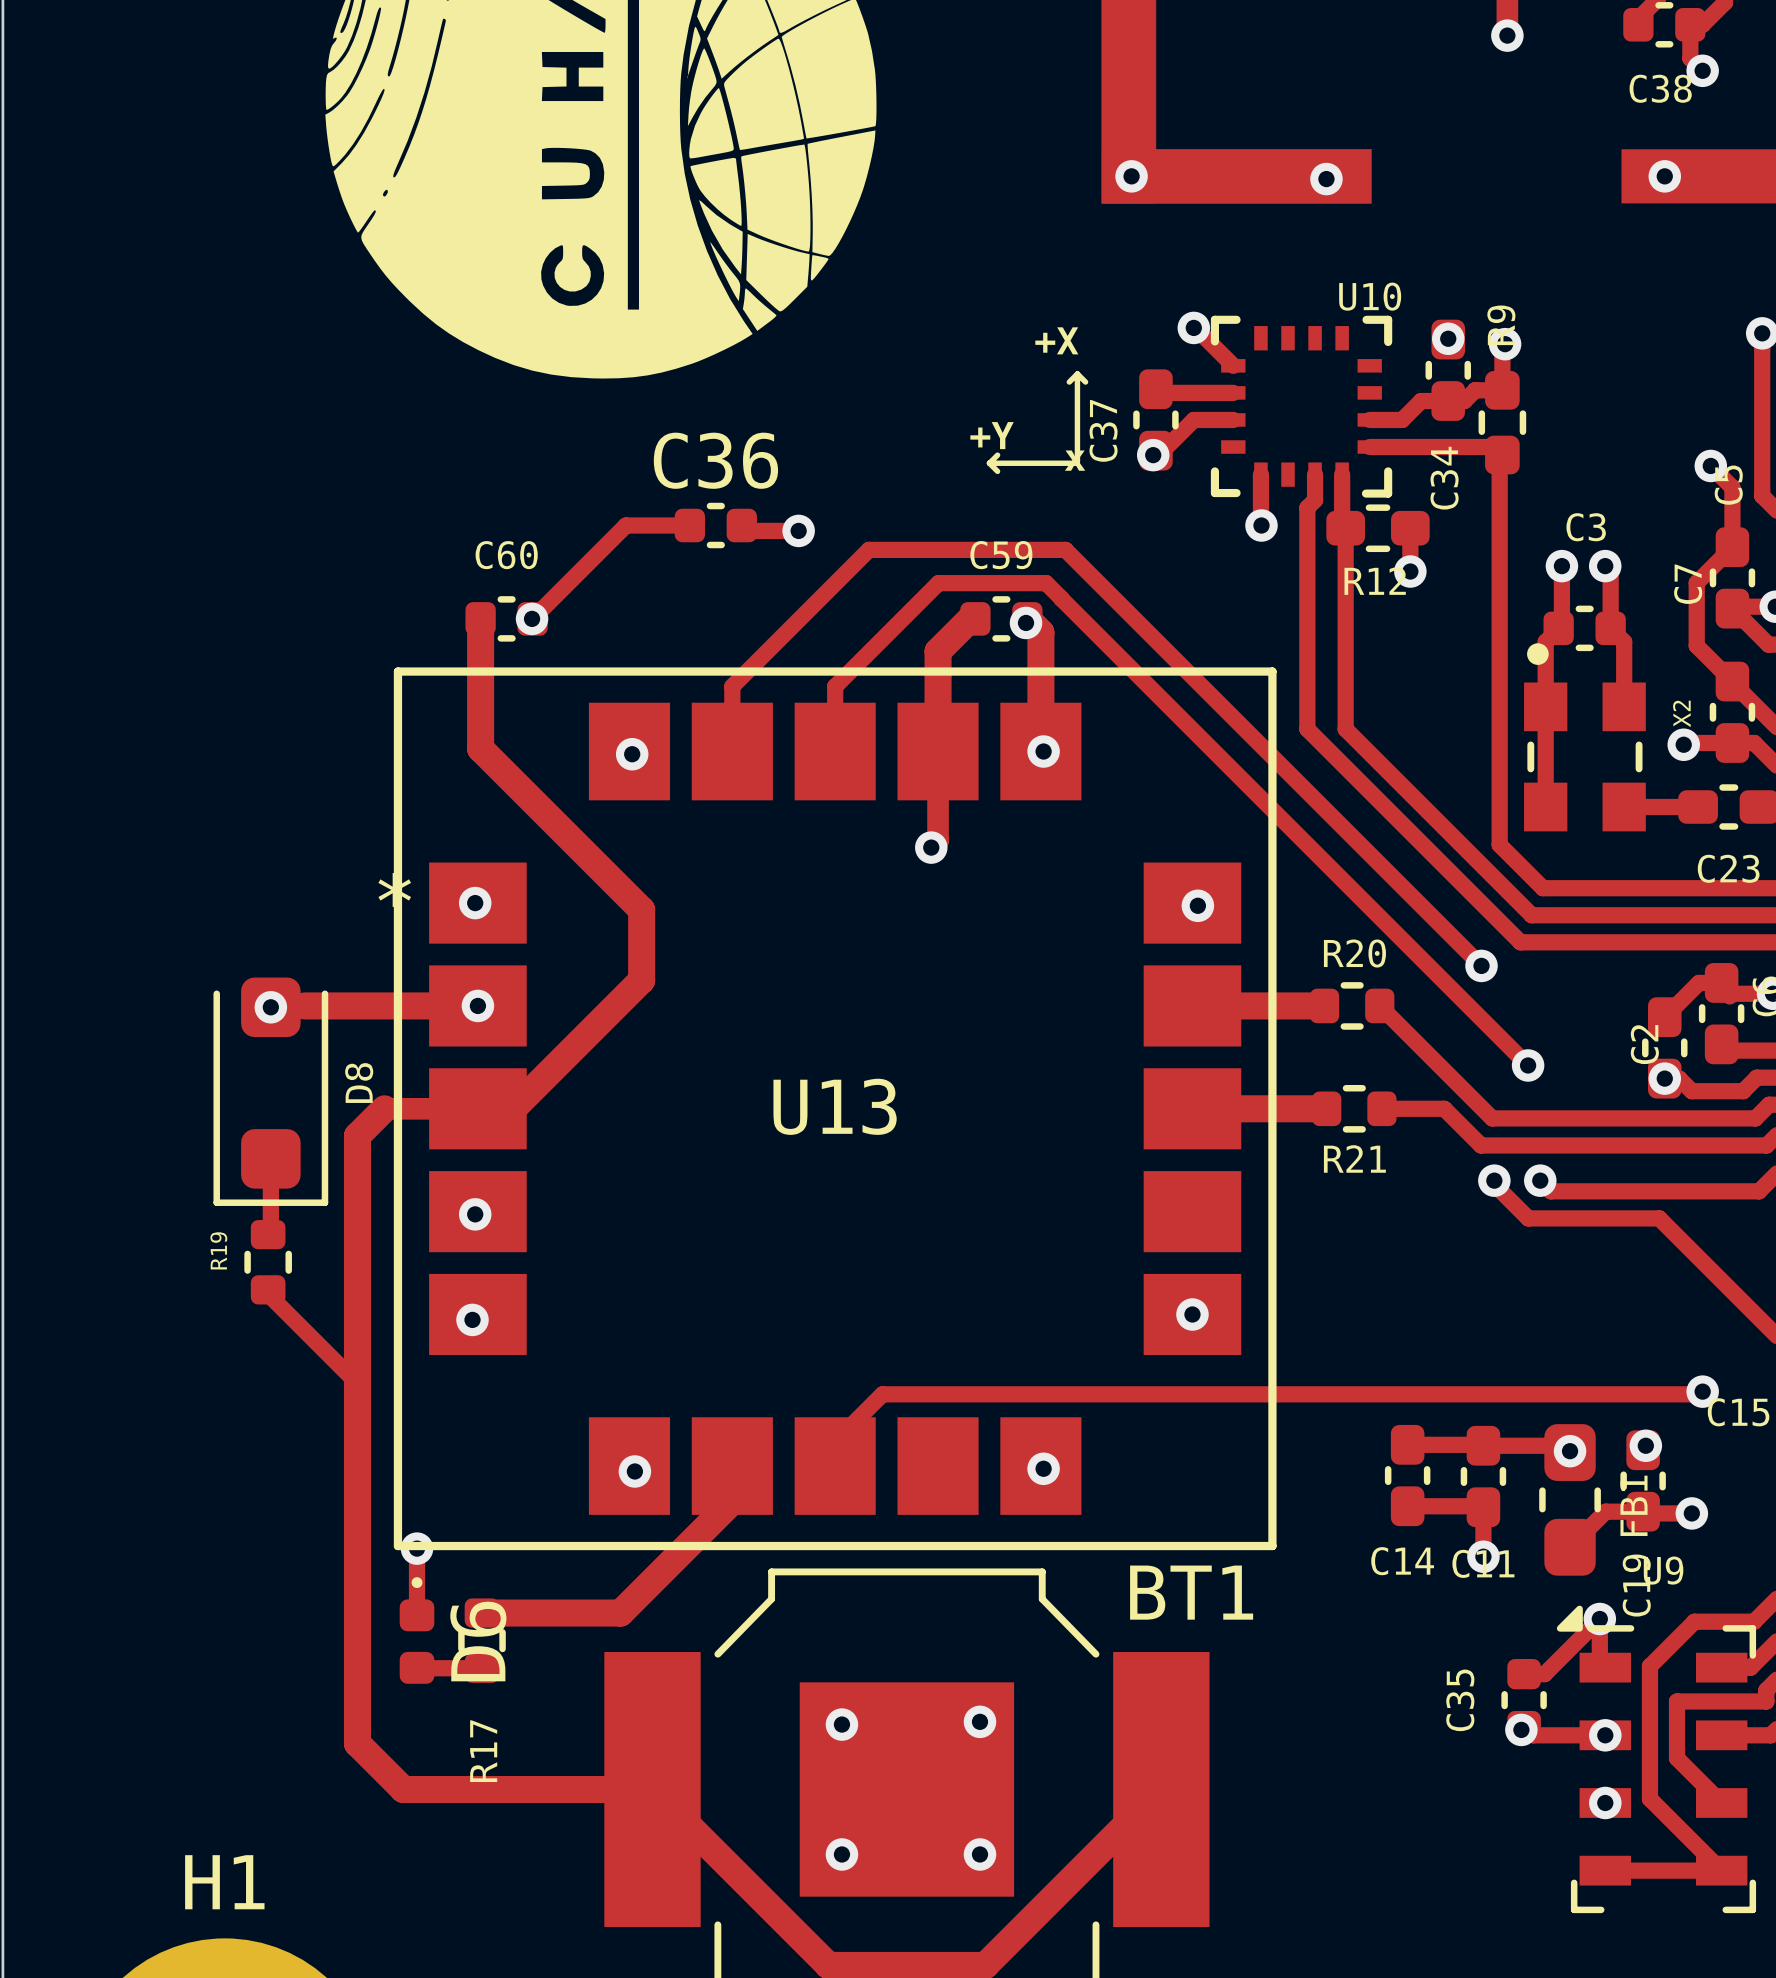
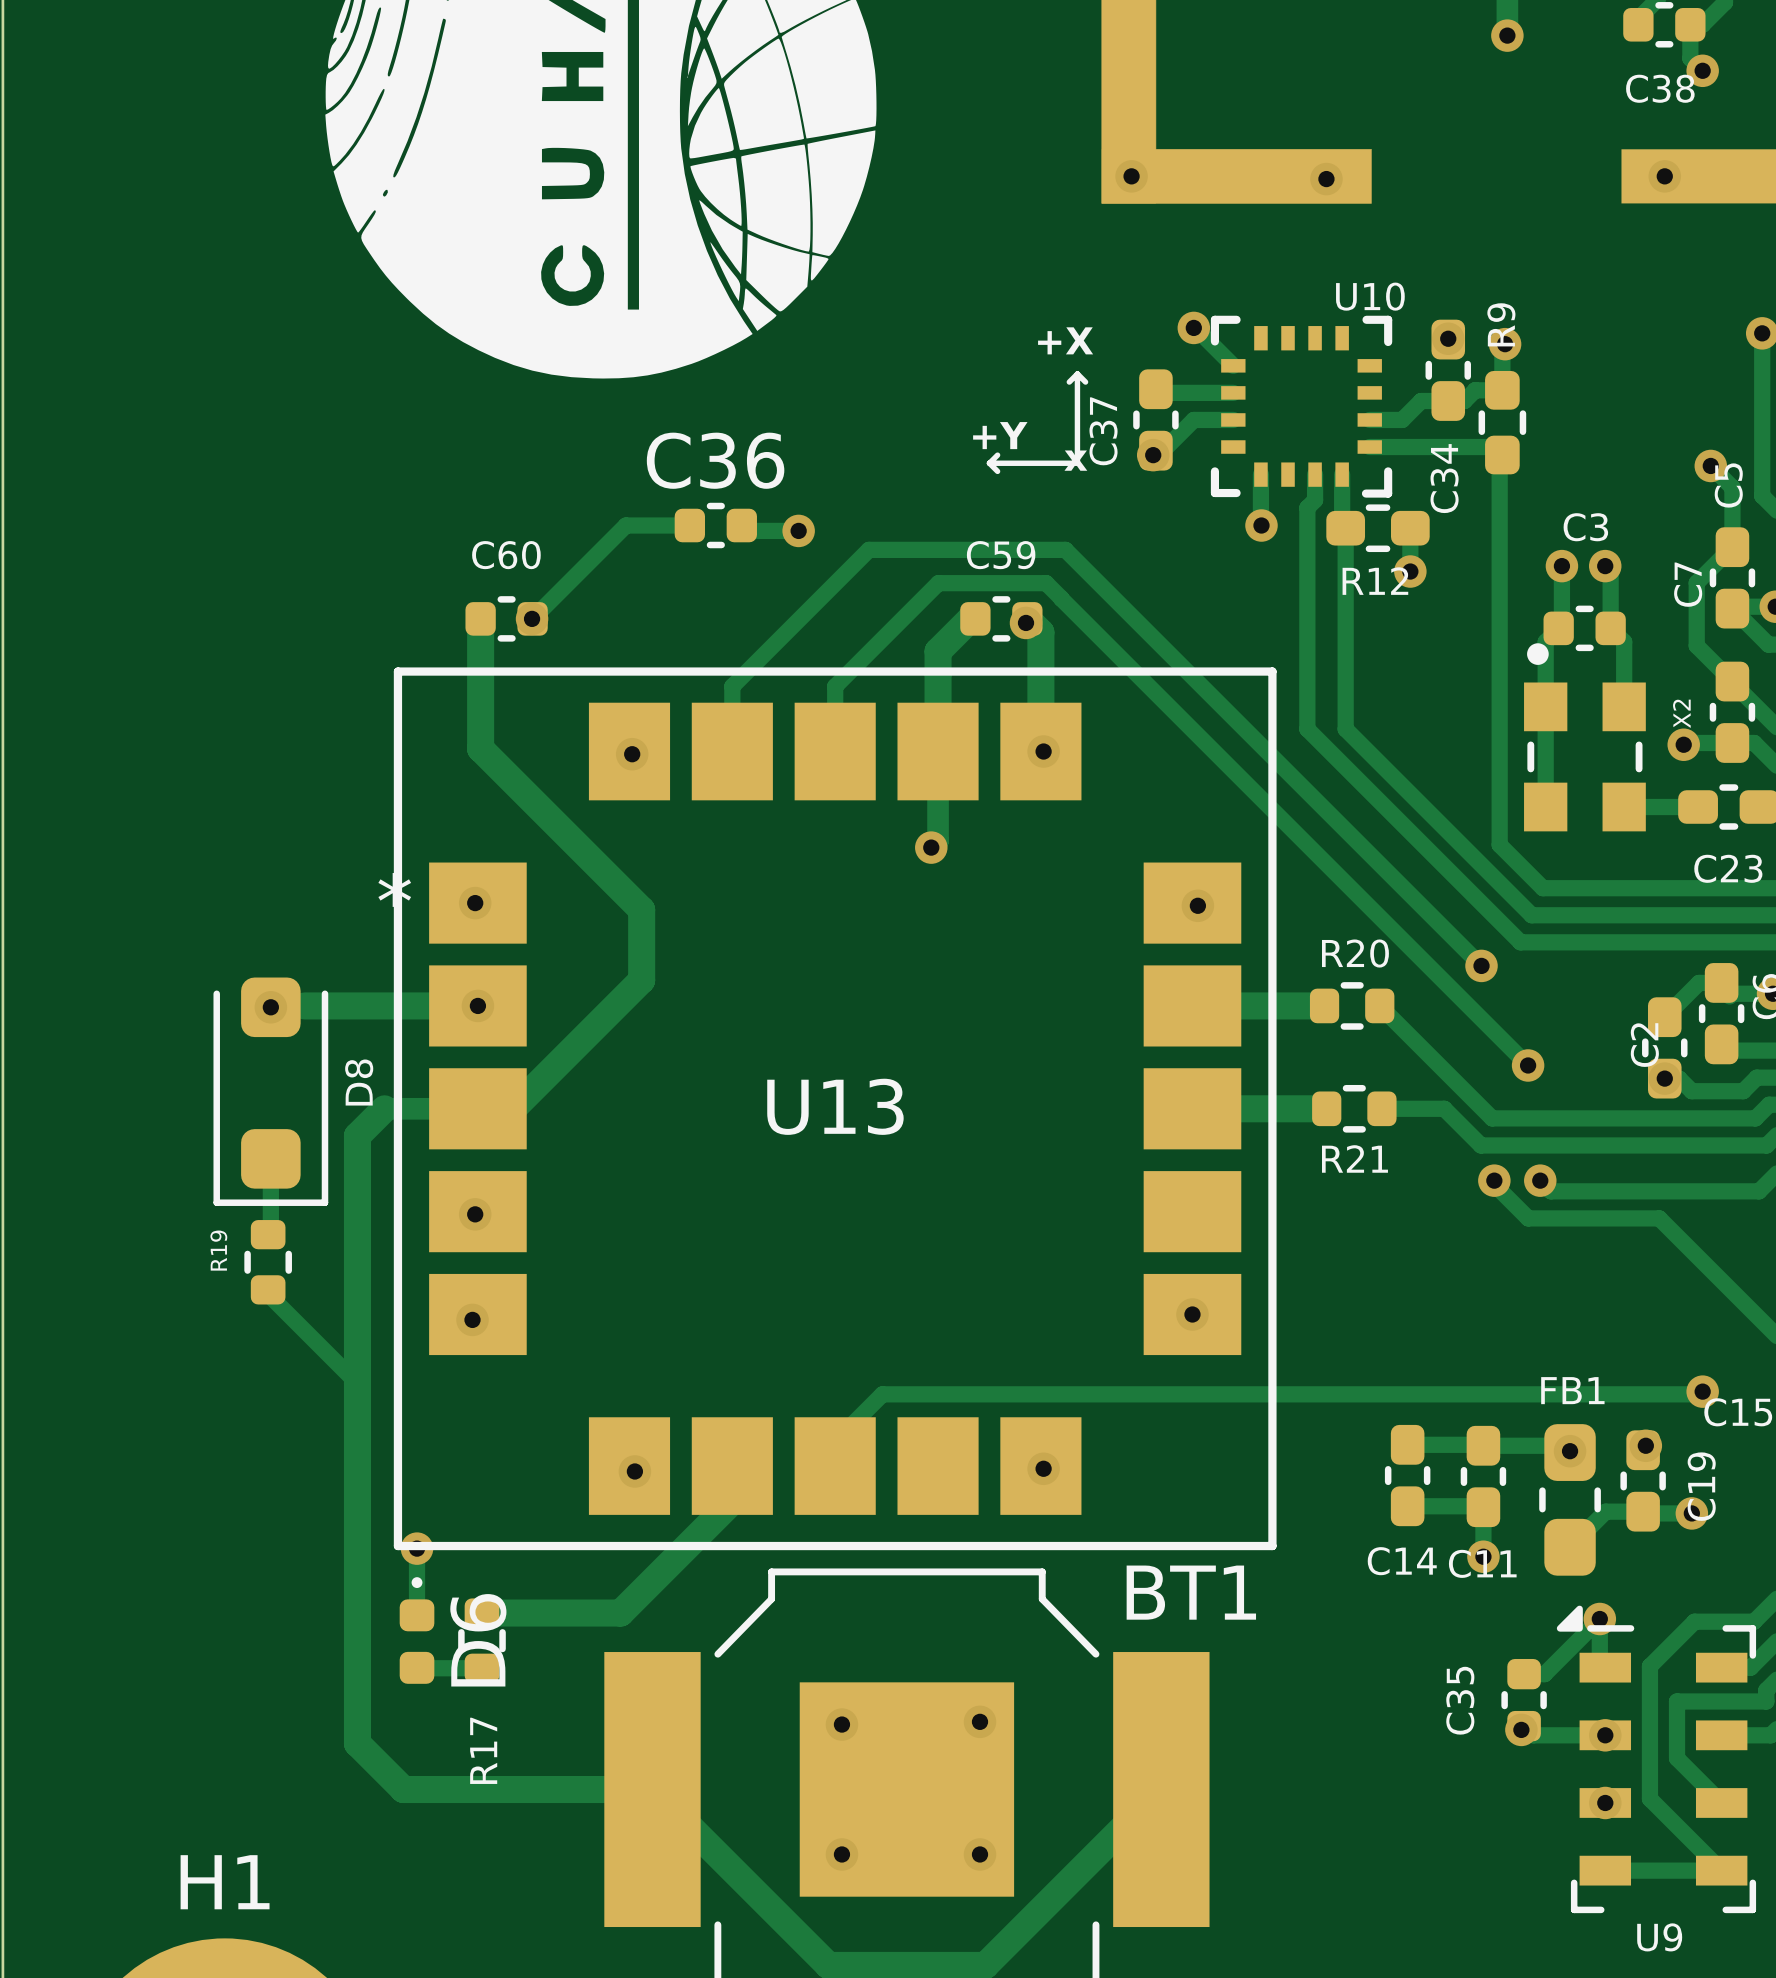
FB1 name rotation: 0° (1633, 1505) -> 90° clockwise (1572, 1390)
FB1 name position: FB1 (1633, 1505) -> FB1 (1572, 1390)
U9 name position: U9 (1663, 1570) -> U9 (1659, 1937)
C19 name position: C19 (1636, 1585) -> C19 (1701, 1486)

